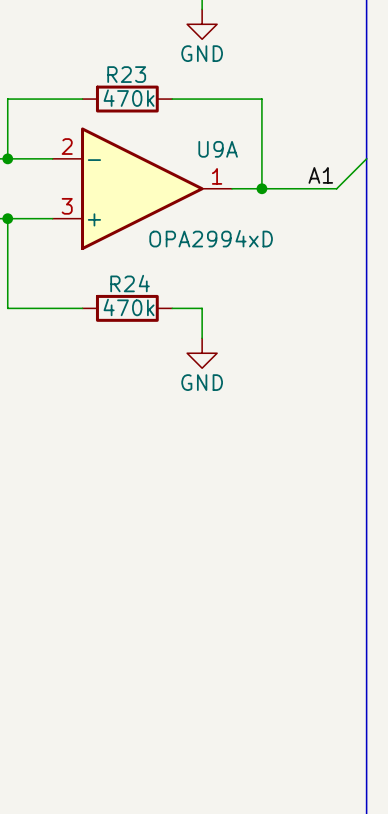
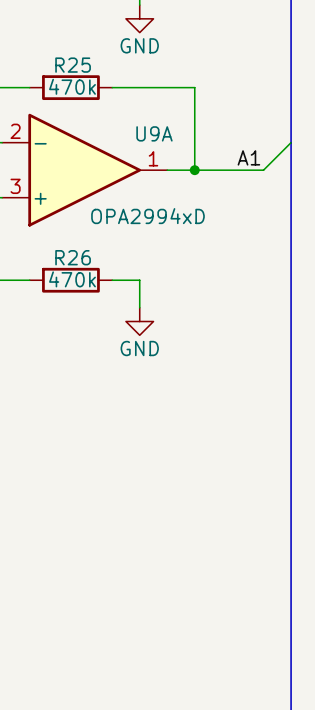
R23 name: R23 (126, 74) -> R25 (73, 65)
R24 name: R24 (130, 283) -> R26 (73, 257)

